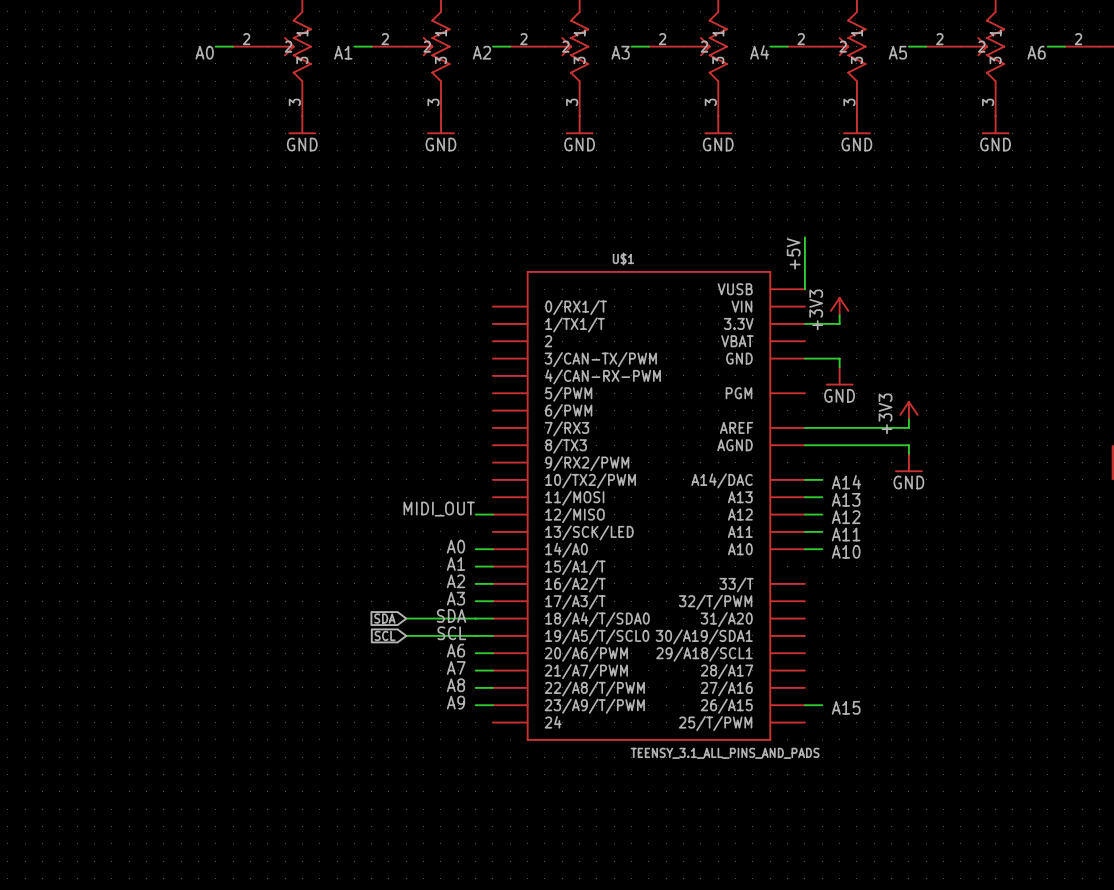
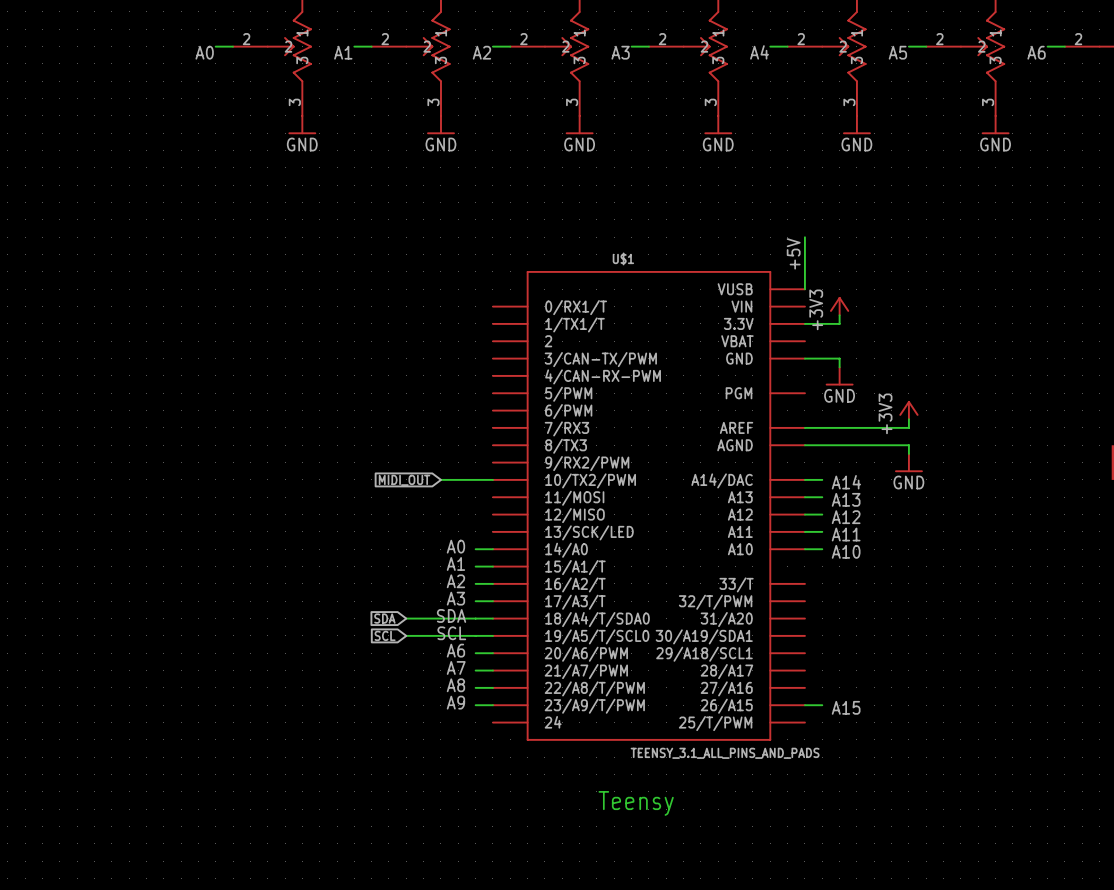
wire: none -> (440, 479) (492, 479)
global label: none -> MIDI_OUT (404, 480)
label: MIDI_OUT (439, 509) -> none
wire: (475, 514) (492, 514) -> none
text: none -> Teensy (636, 803)

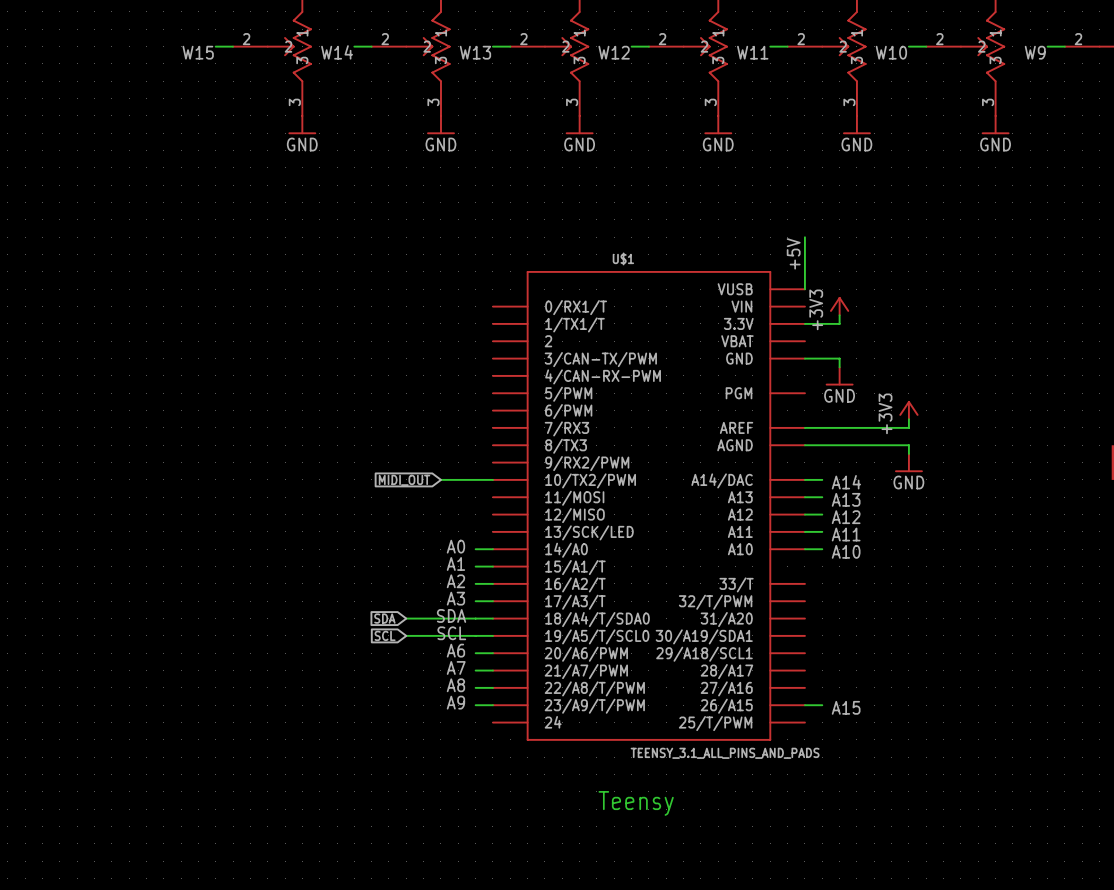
label: A0 (204, 52) -> W15 (198, 52)
label: A1 (343, 52) -> W14 (337, 52)
label: A2 (481, 52) -> W13 (475, 52)
label: A3 (620, 52) -> W12 (614, 52)
label: A4 (759, 52) -> W11 (752, 52)
label: A5 (897, 52) -> W10 (891, 52)
label: A6 (1036, 52) -> W9 (1035, 52)

